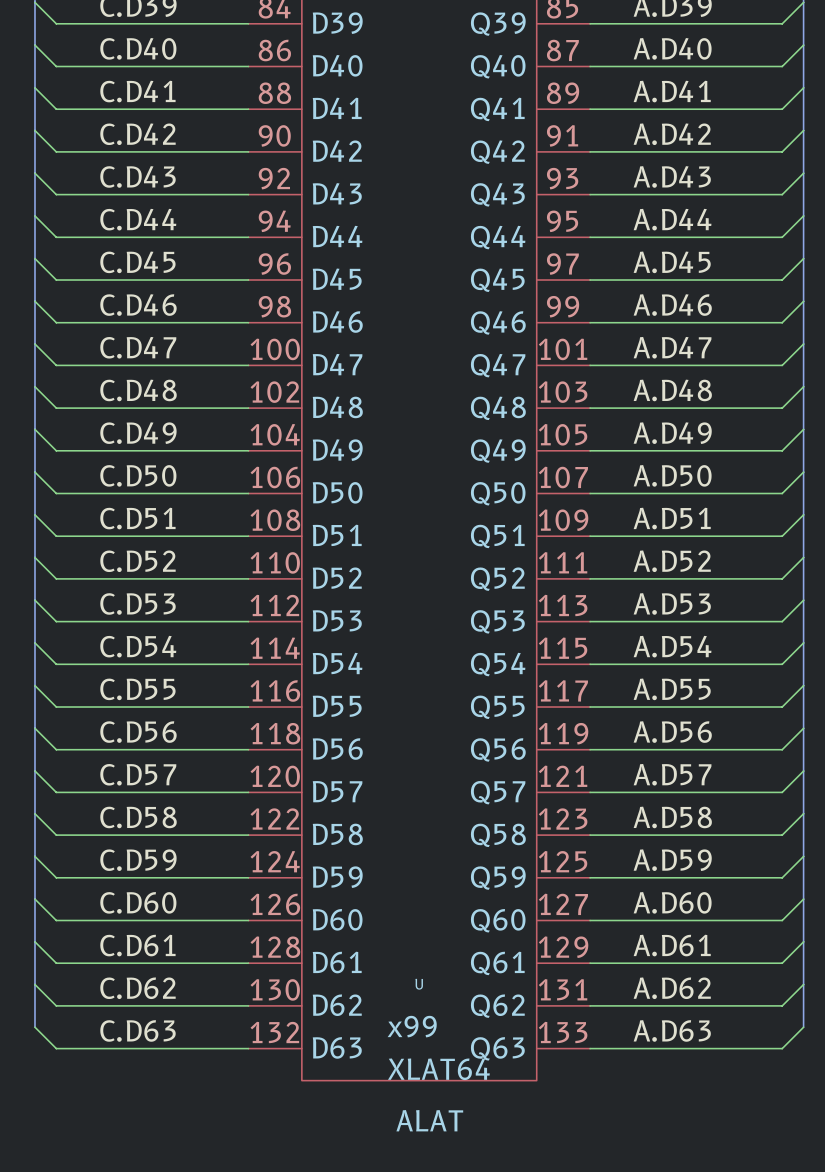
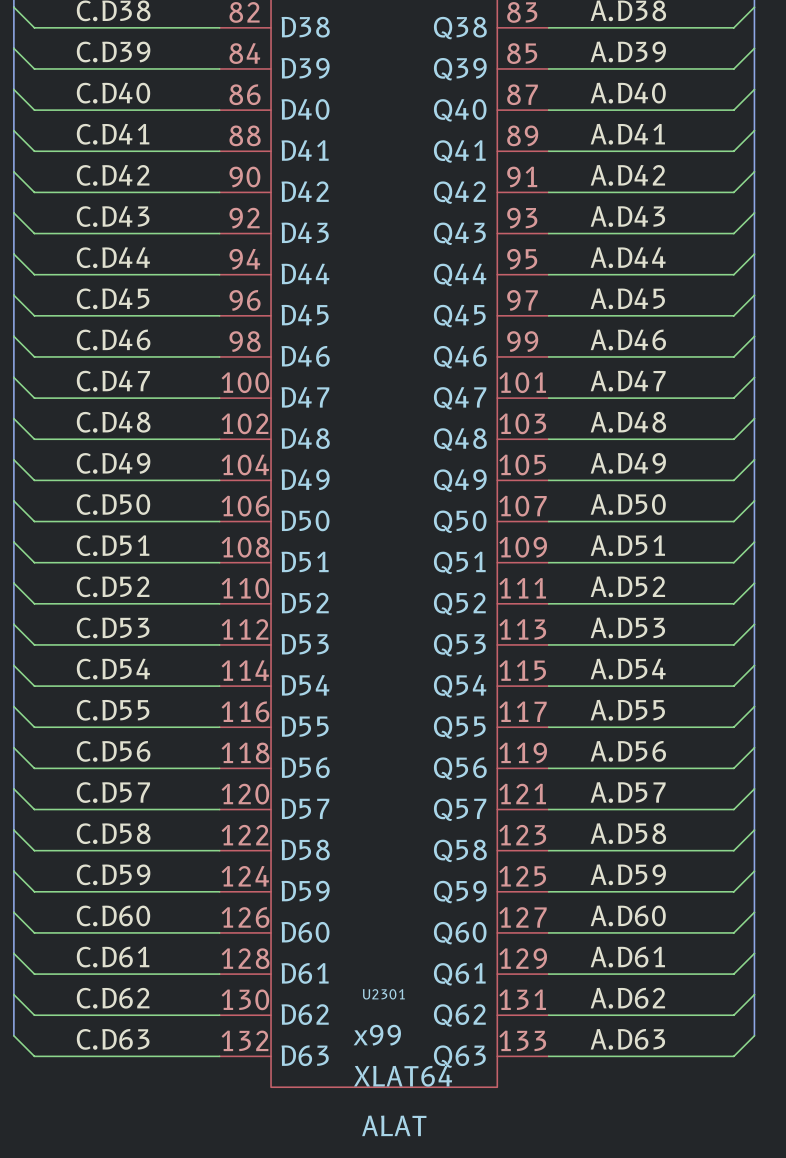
U name: U (419, 984) -> U2301 (383, 994)

